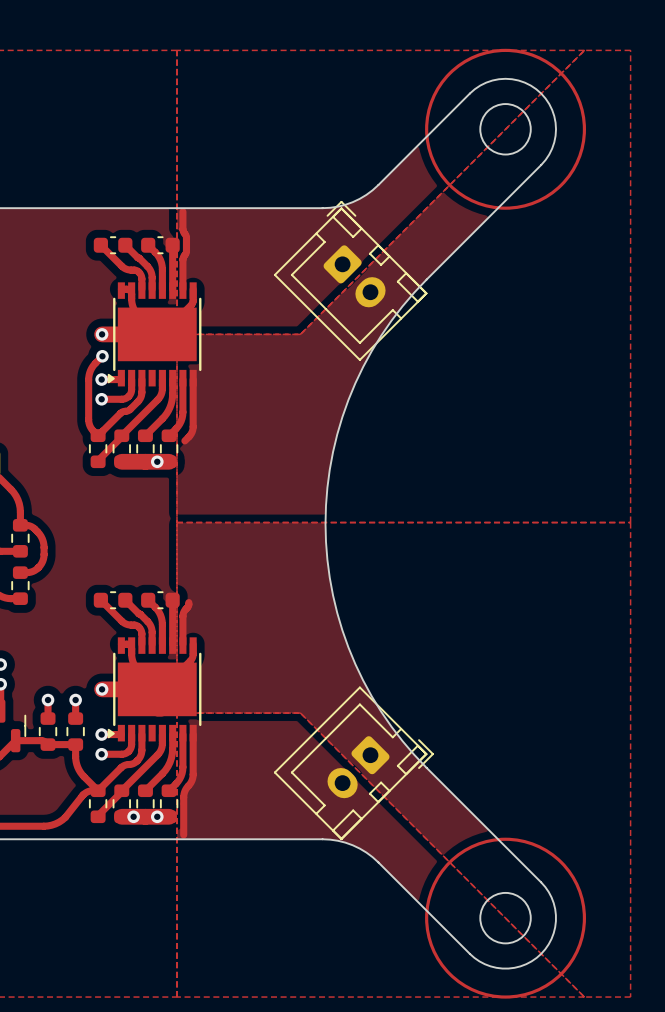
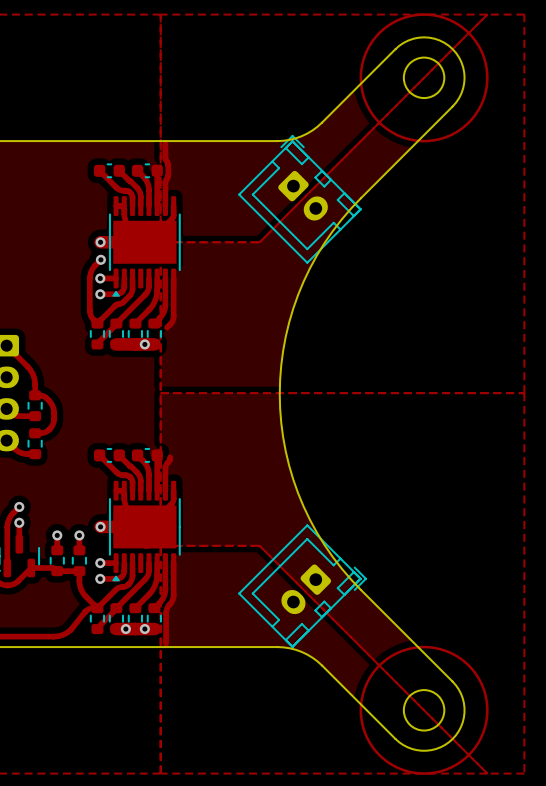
part footprint: [107, 282, 202, 387] -> [109, 196, 181, 297]
part footprint: [107, 637, 202, 742] -> [109, 480, 181, 582]

